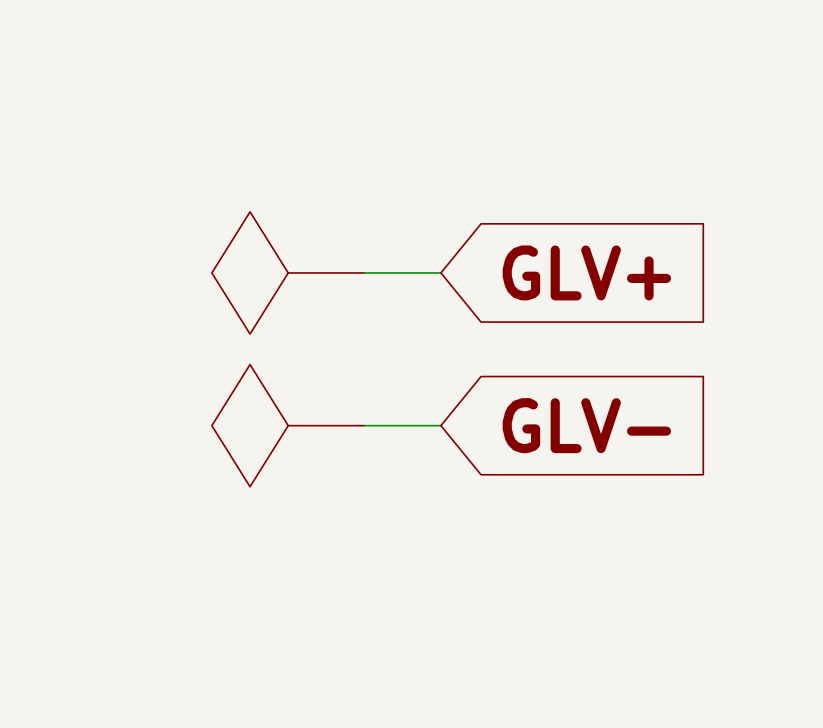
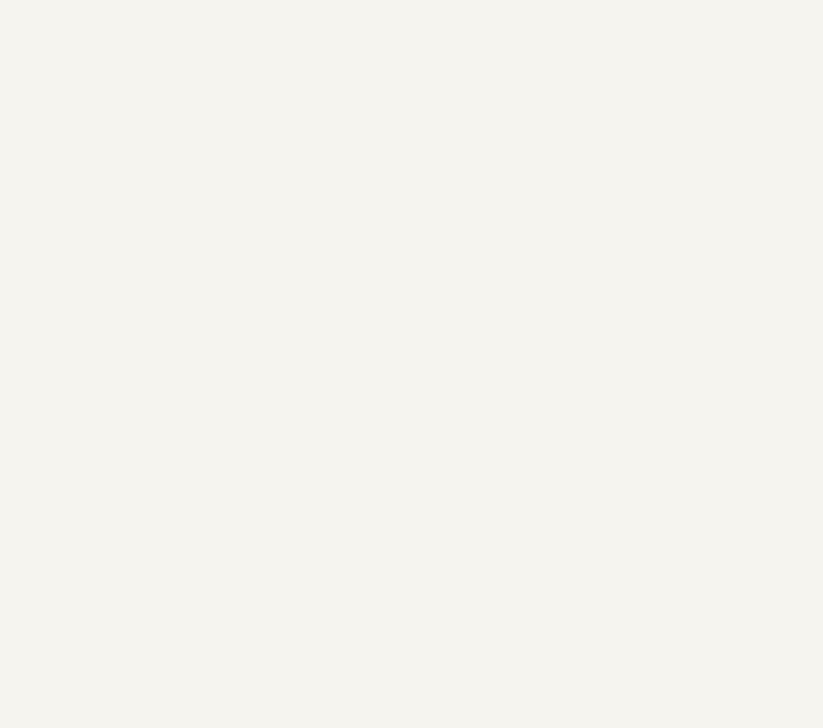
power symbol: (288, 272) -> none
wire: (364, 272) (440, 272) -> none
global label: GLV+ (586, 272) -> none
power symbol: (288, 425) -> none
wire: (364, 425) (440, 425) -> none
global label: GLV- (586, 425) -> none

